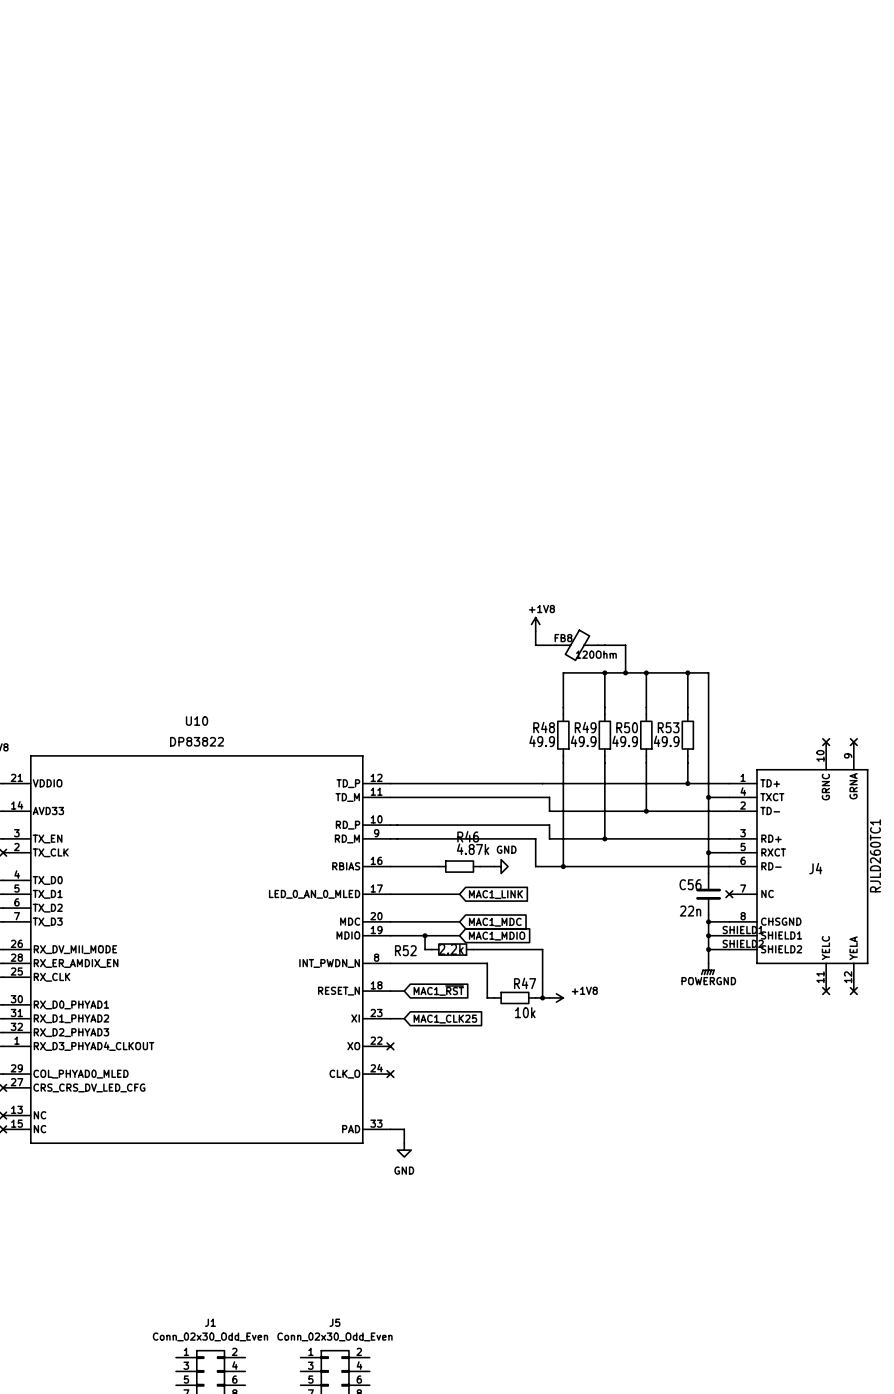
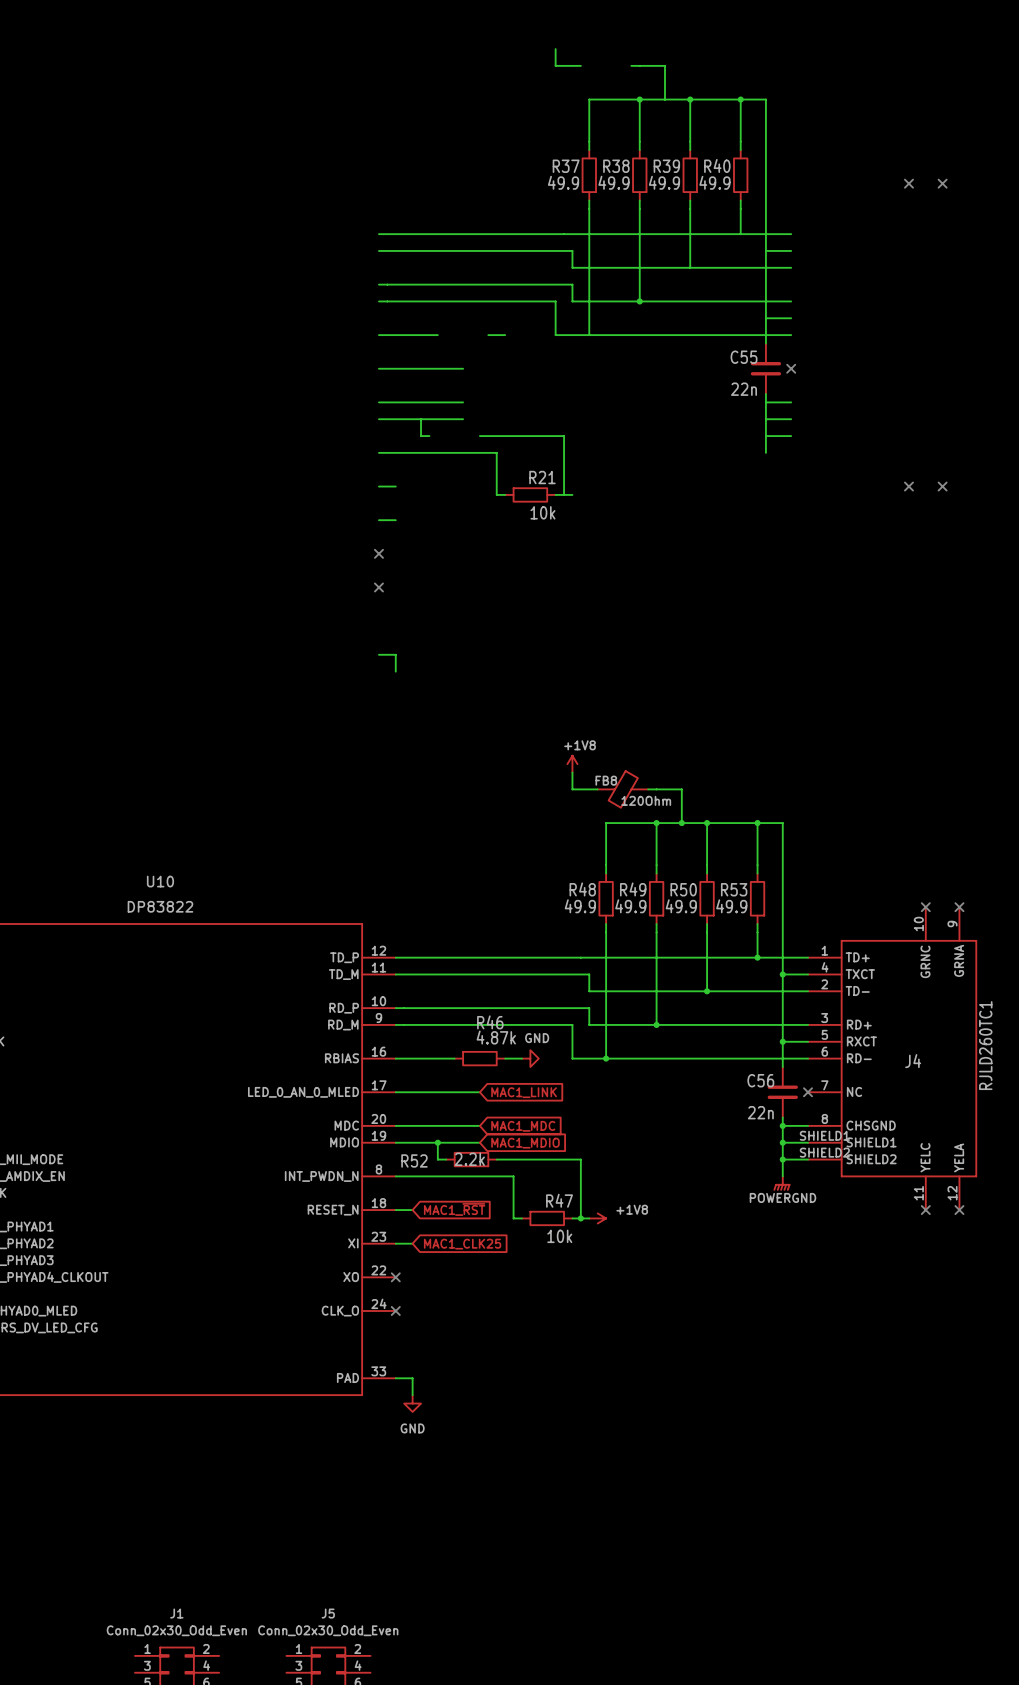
wire: none -> (555, 49) (555, 65) (580, 65)
wire: none -> (631, 65) (664, 65) (664, 99)
wire: none -> (639, 99) (639, 150)
junction: none -> (639, 99)
wire: none -> (690, 99) (690, 150)
junction: none -> (690, 99)
wire: none -> (740, 99) (740, 150)
junction: none -> (740, 99)
wire: none -> (589, 150) (589, 99) (765, 99) (765, 343)
R37: none -> 49.9 (589, 175)
R38: none -> 49.9 (639, 175)
R39: none -> 49.9 (690, 175)
R40: none -> 49.9 (740, 175)
no-connect mark: none -> (908, 183)
no-connect mark: none -> (942, 183)
wire: none -> (589, 200) (589, 335)
wire: none -> (639, 200) (639, 301)
wire: none -> (690, 200) (690, 267)
wire: none -> (740, 200) (740, 234)
wire: none -> (378, 234) (791, 234)
wire: none -> (378, 250) (572, 250) (572, 267) (791, 267)
wire: none -> (765, 250) (791, 250)
wire: none -> (378, 284) (572, 284) (572, 301) (791, 301)
wire: none -> (378, 301) (555, 301) (555, 335) (791, 335)
junction: none -> (639, 301)
wire: none -> (765, 318) (791, 318)
wire: none -> (378, 335) (437, 335)
wire: none -> (488, 335) (505, 335)
wire: none -> (378, 368) (463, 368)
C55: none -> 22n (765, 368)
no-connect mark: none -> (791, 368)
wire: none -> (765, 393) (765, 452)
wire: none -> (378, 402) (463, 402)
wire: none -> (765, 402) (791, 402)
wire: none -> (378, 419) (463, 419)
wire: none -> (421, 419) (421, 436) (429, 436)
wire: none -> (765, 419) (791, 419)
wire: none -> (479, 436) (564, 436) (564, 494)
wire: none -> (765, 436) (791, 436)
wire: none -> (378, 452) (496, 452) (496, 494) (505, 494)
wire: none -> (378, 486) (395, 486)
no-connect mark: none -> (908, 486)
no-connect mark: none -> (942, 486)
R21: none -> 10k (530, 494)
wire: none -> (555, 494) (572, 494)
wire: none -> (378, 520) (395, 520)
no-connect mark: none -> (378, 553)
no-connect mark: none -> (378, 587)
wire: none -> (378, 654) (395, 654) (395, 671)

